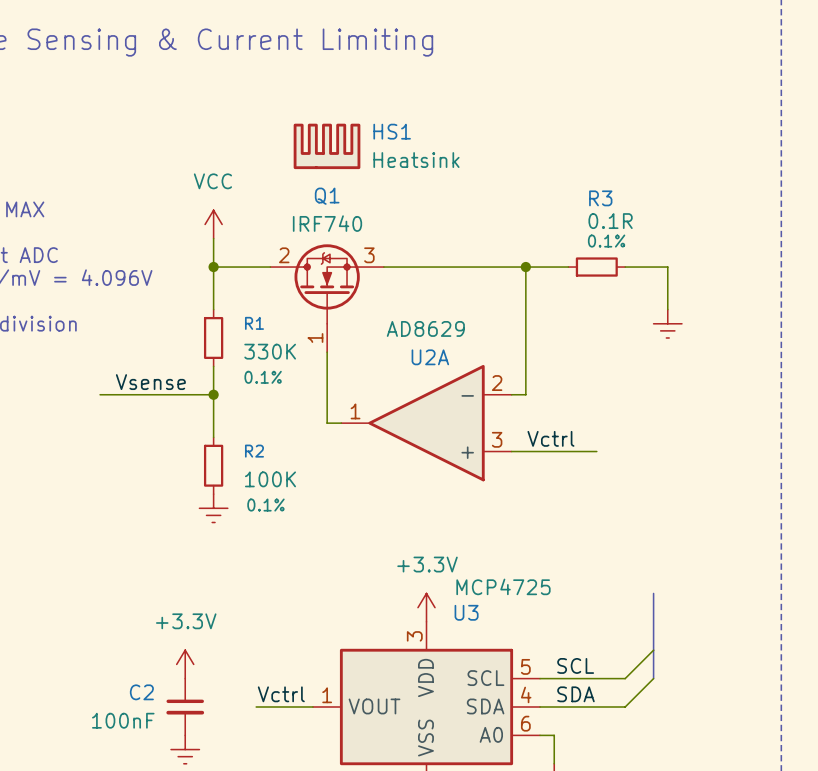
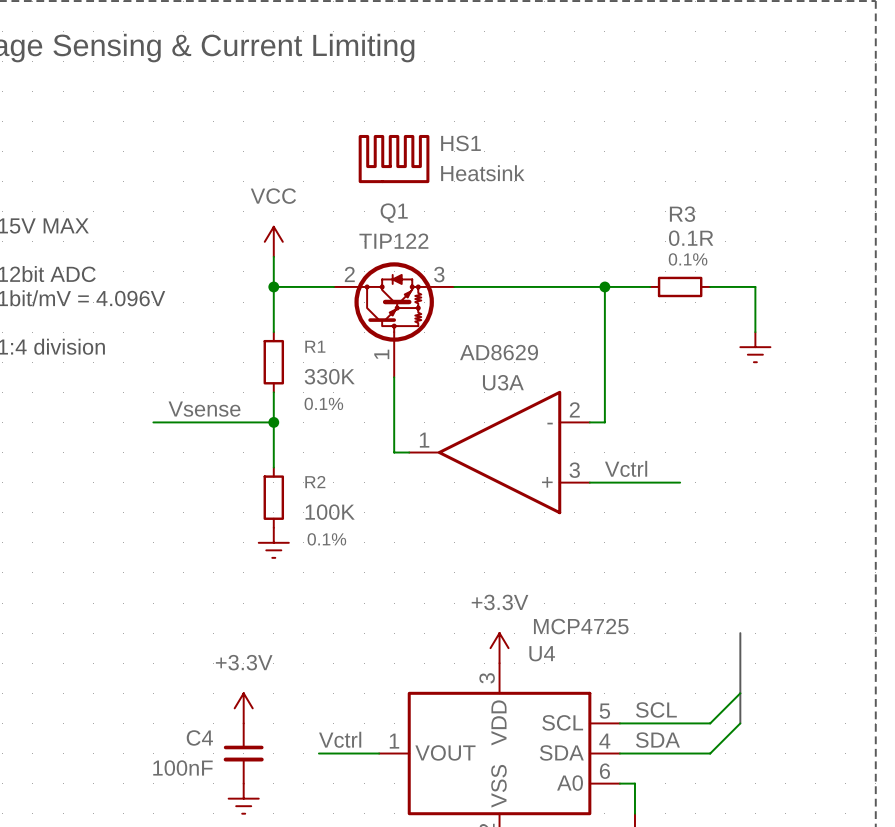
Q1 value: IRF740 (327, 223) -> TIP122 (393, 241)
Q1 symbol: [270, 244, 384, 353] -> [333, 262, 455, 378]
U2A name: U2A (430, 357) -> U3A (503, 382)
U3 name: U3 (466, 612) -> U4 (542, 653)
C2 name: C2 (141, 692) -> C4 (199, 737)

